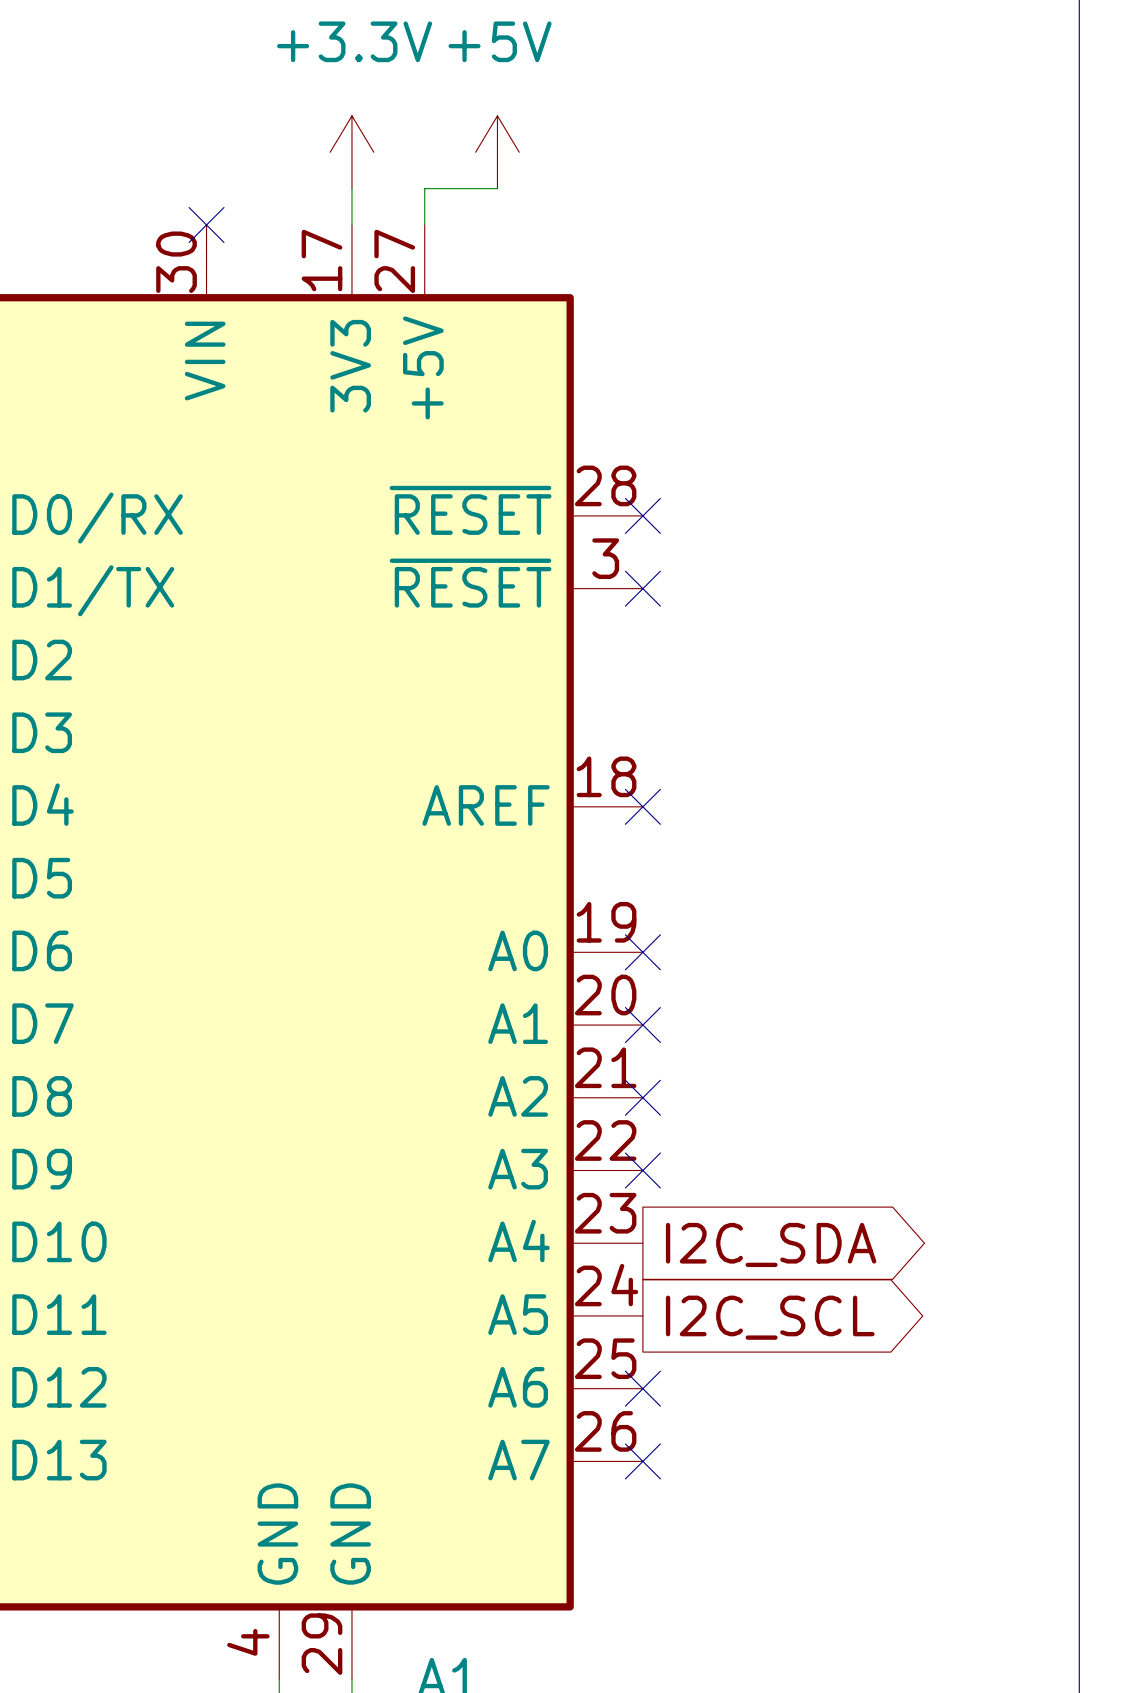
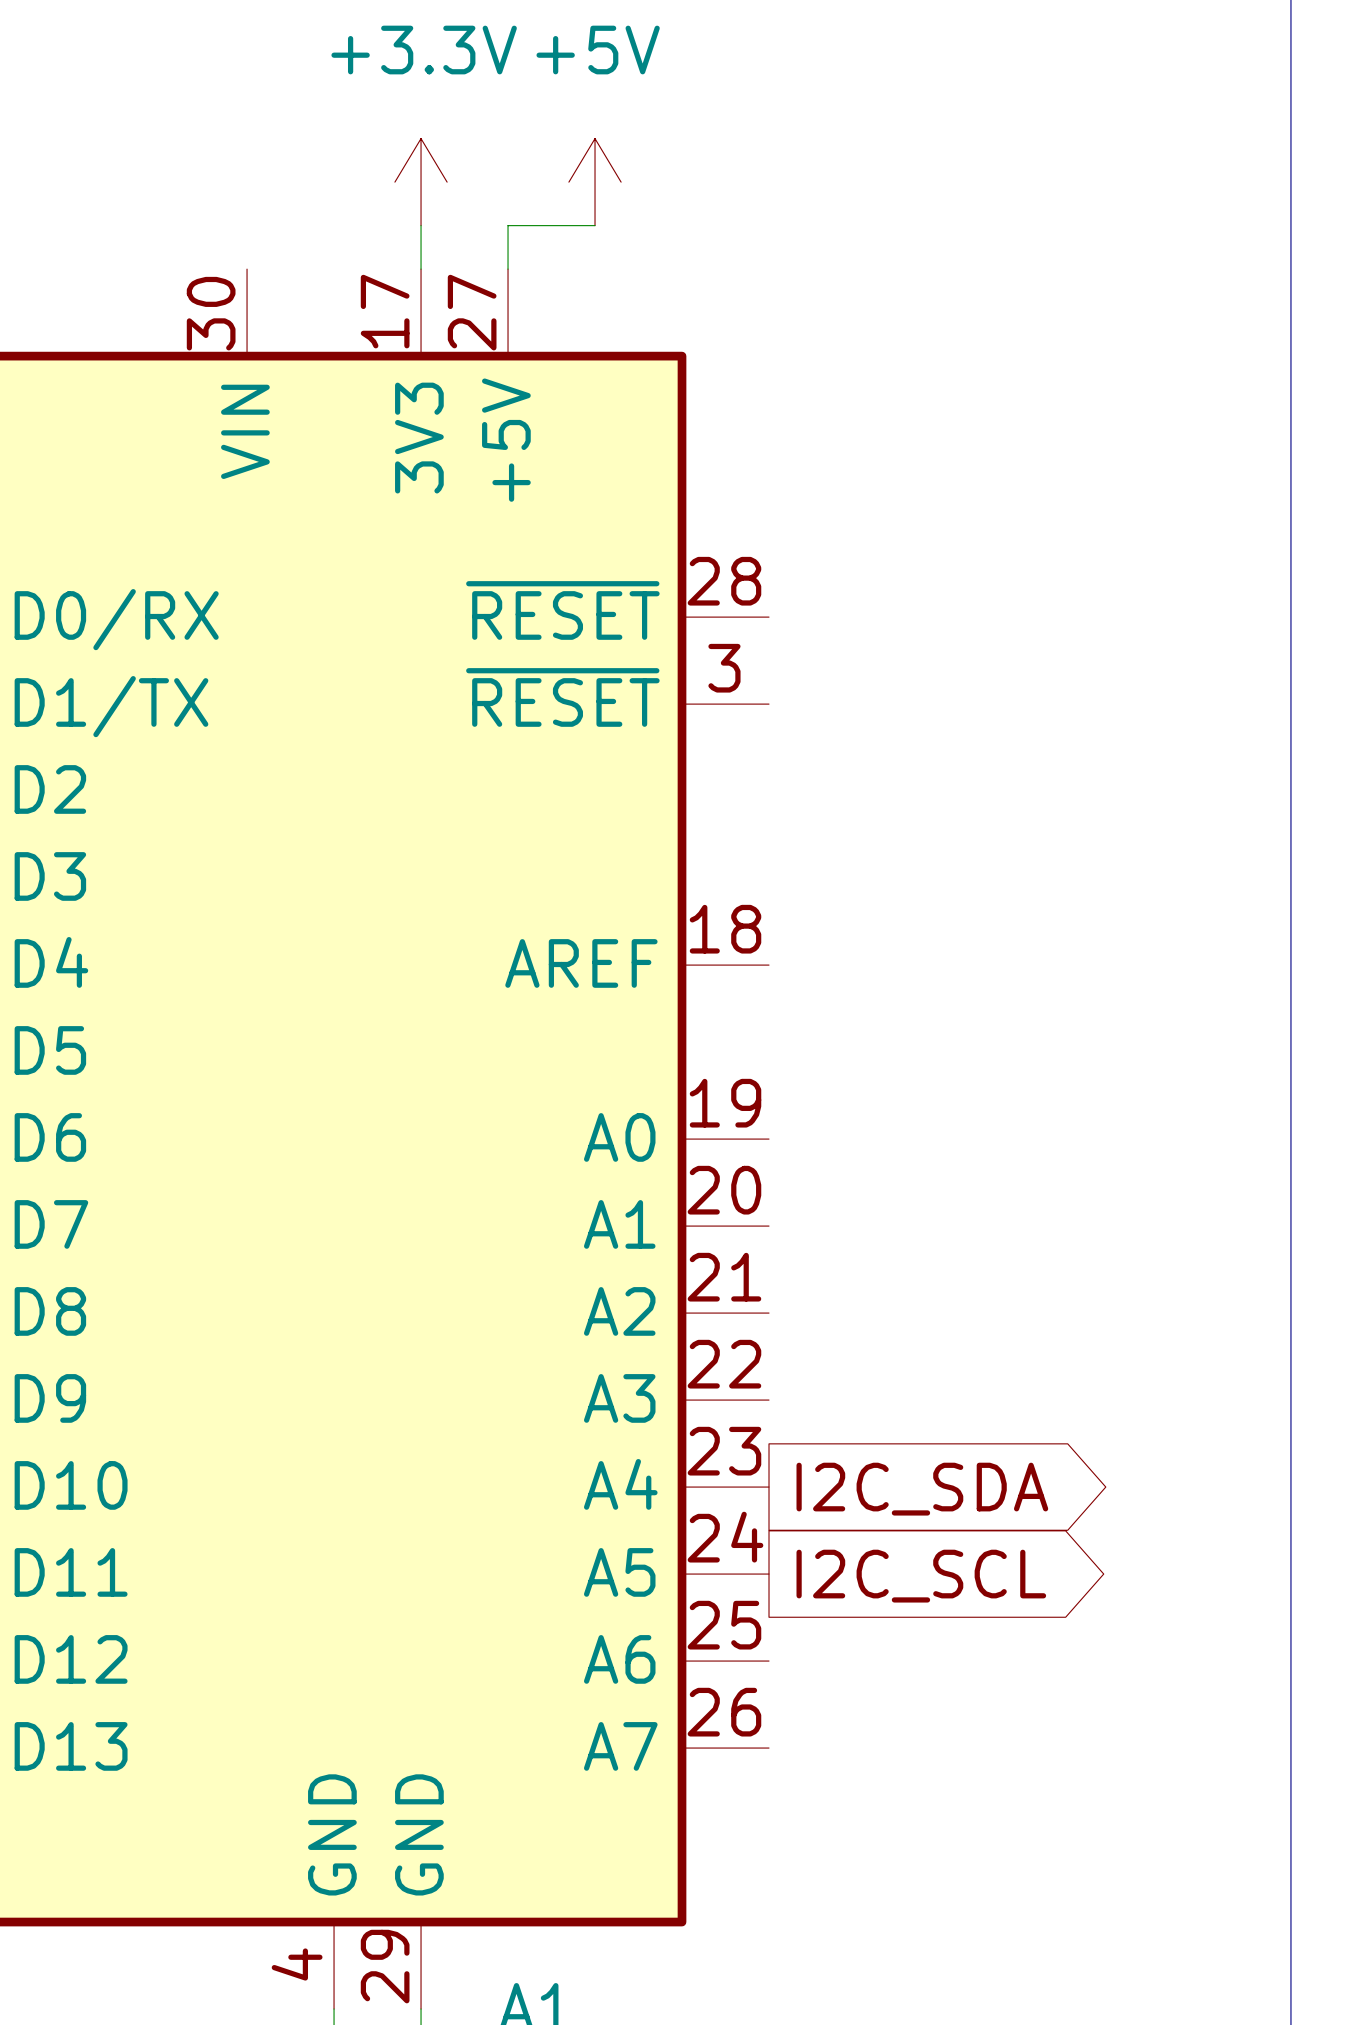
no-connect mark: (206, 224) -> none
no-connect mark: (642, 515) -> none
no-connect mark: (642, 588) -> none
no-connect mark: (642, 806) -> none
no-connect mark: (642, 952) -> none
no-connect mark: (642, 1025) -> none
no-connect mark: (642, 1097) -> none
no-connect mark: (642, 1170) -> none
no-connect mark: (642, 1388) -> none
no-connect mark: (642, 1461) -> none

